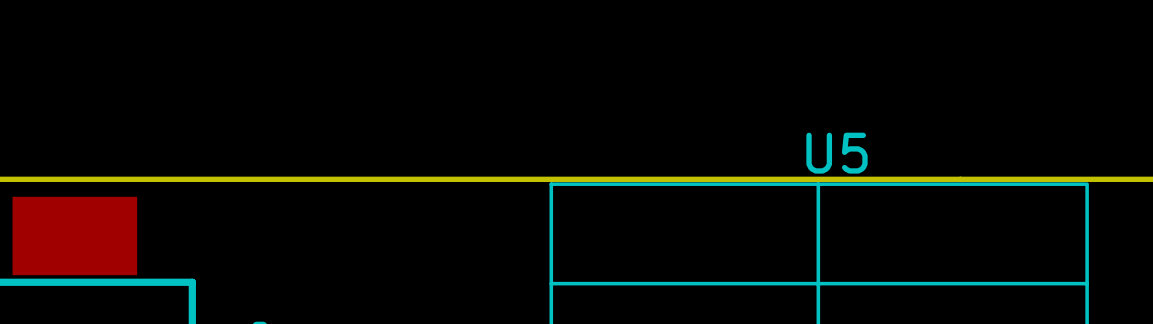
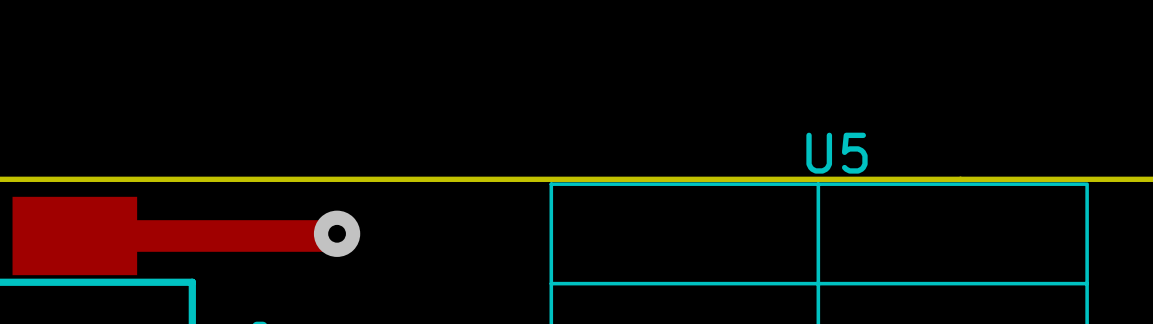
track: none -> (337, 233) (334, 235) (74, 235)
via: none -> (337, 233)

